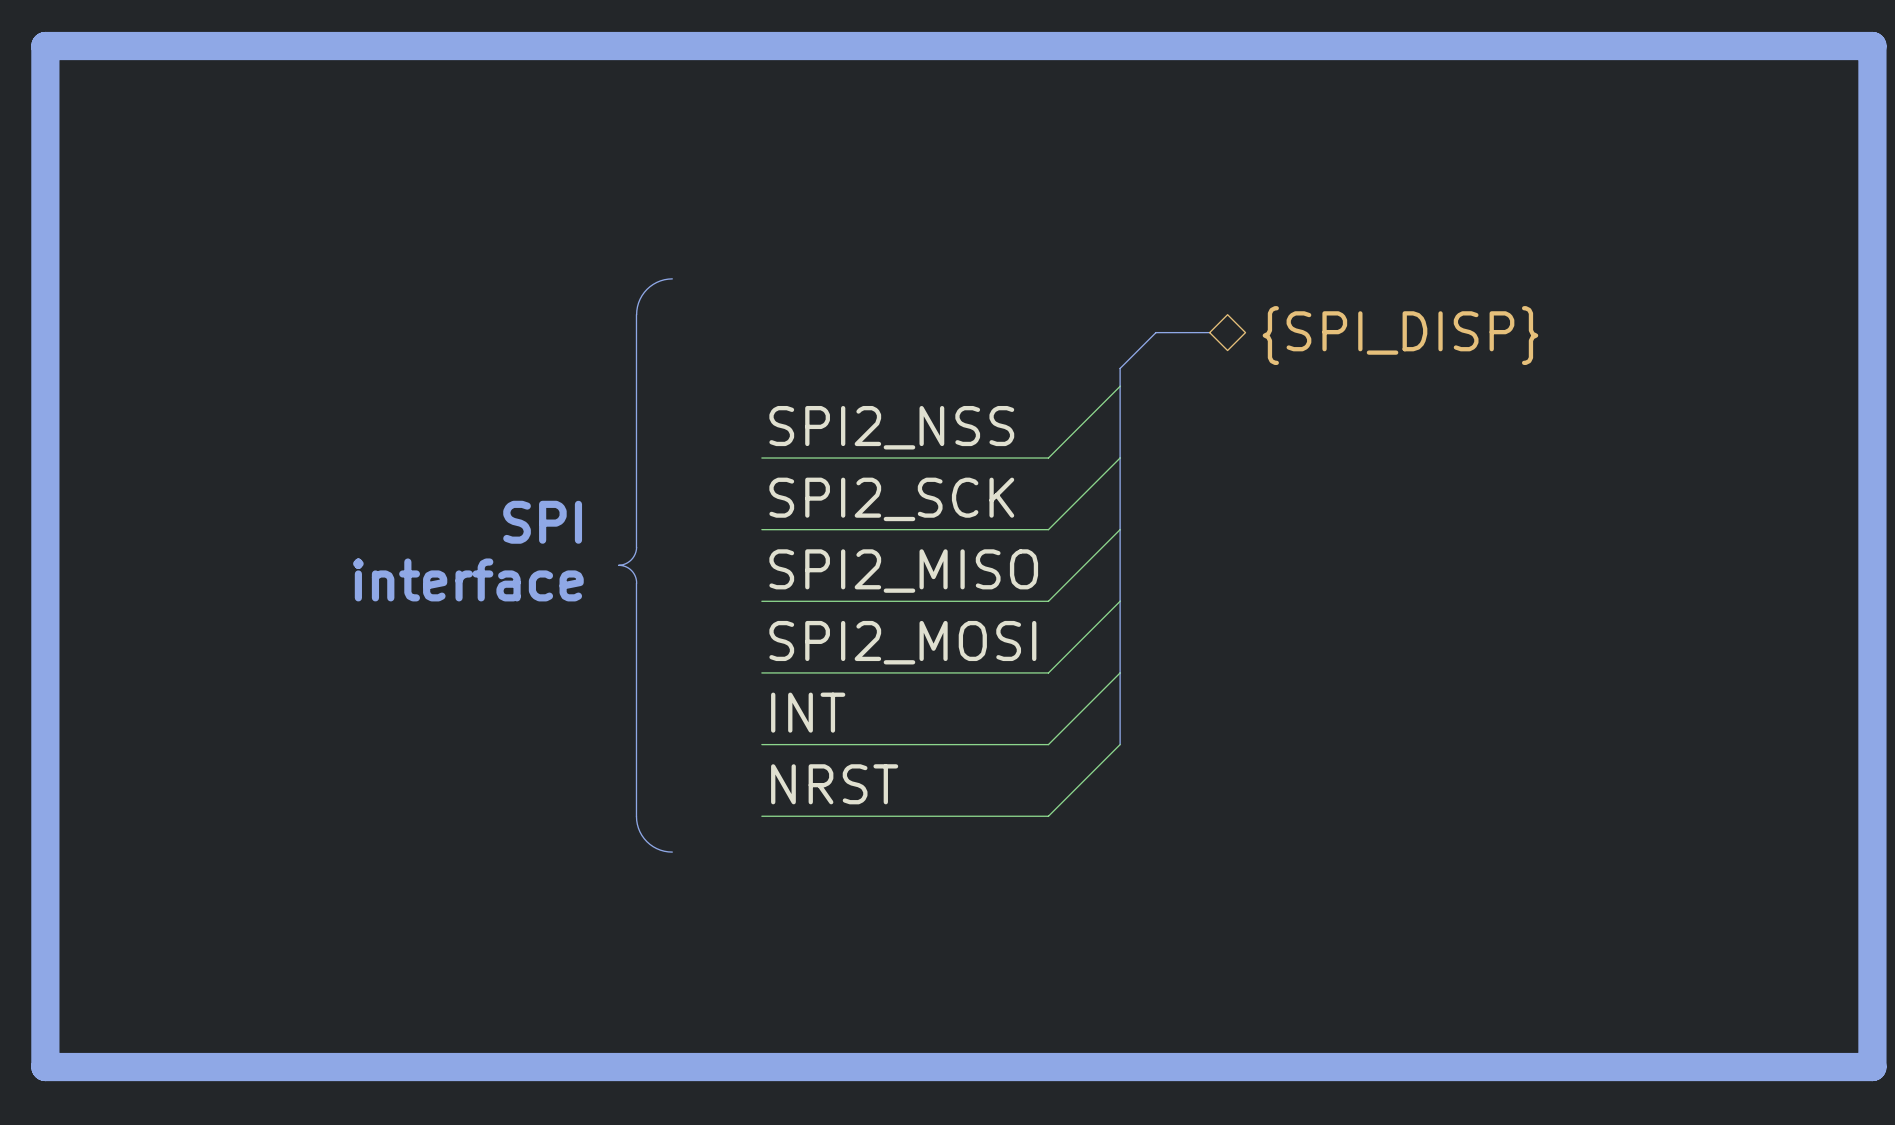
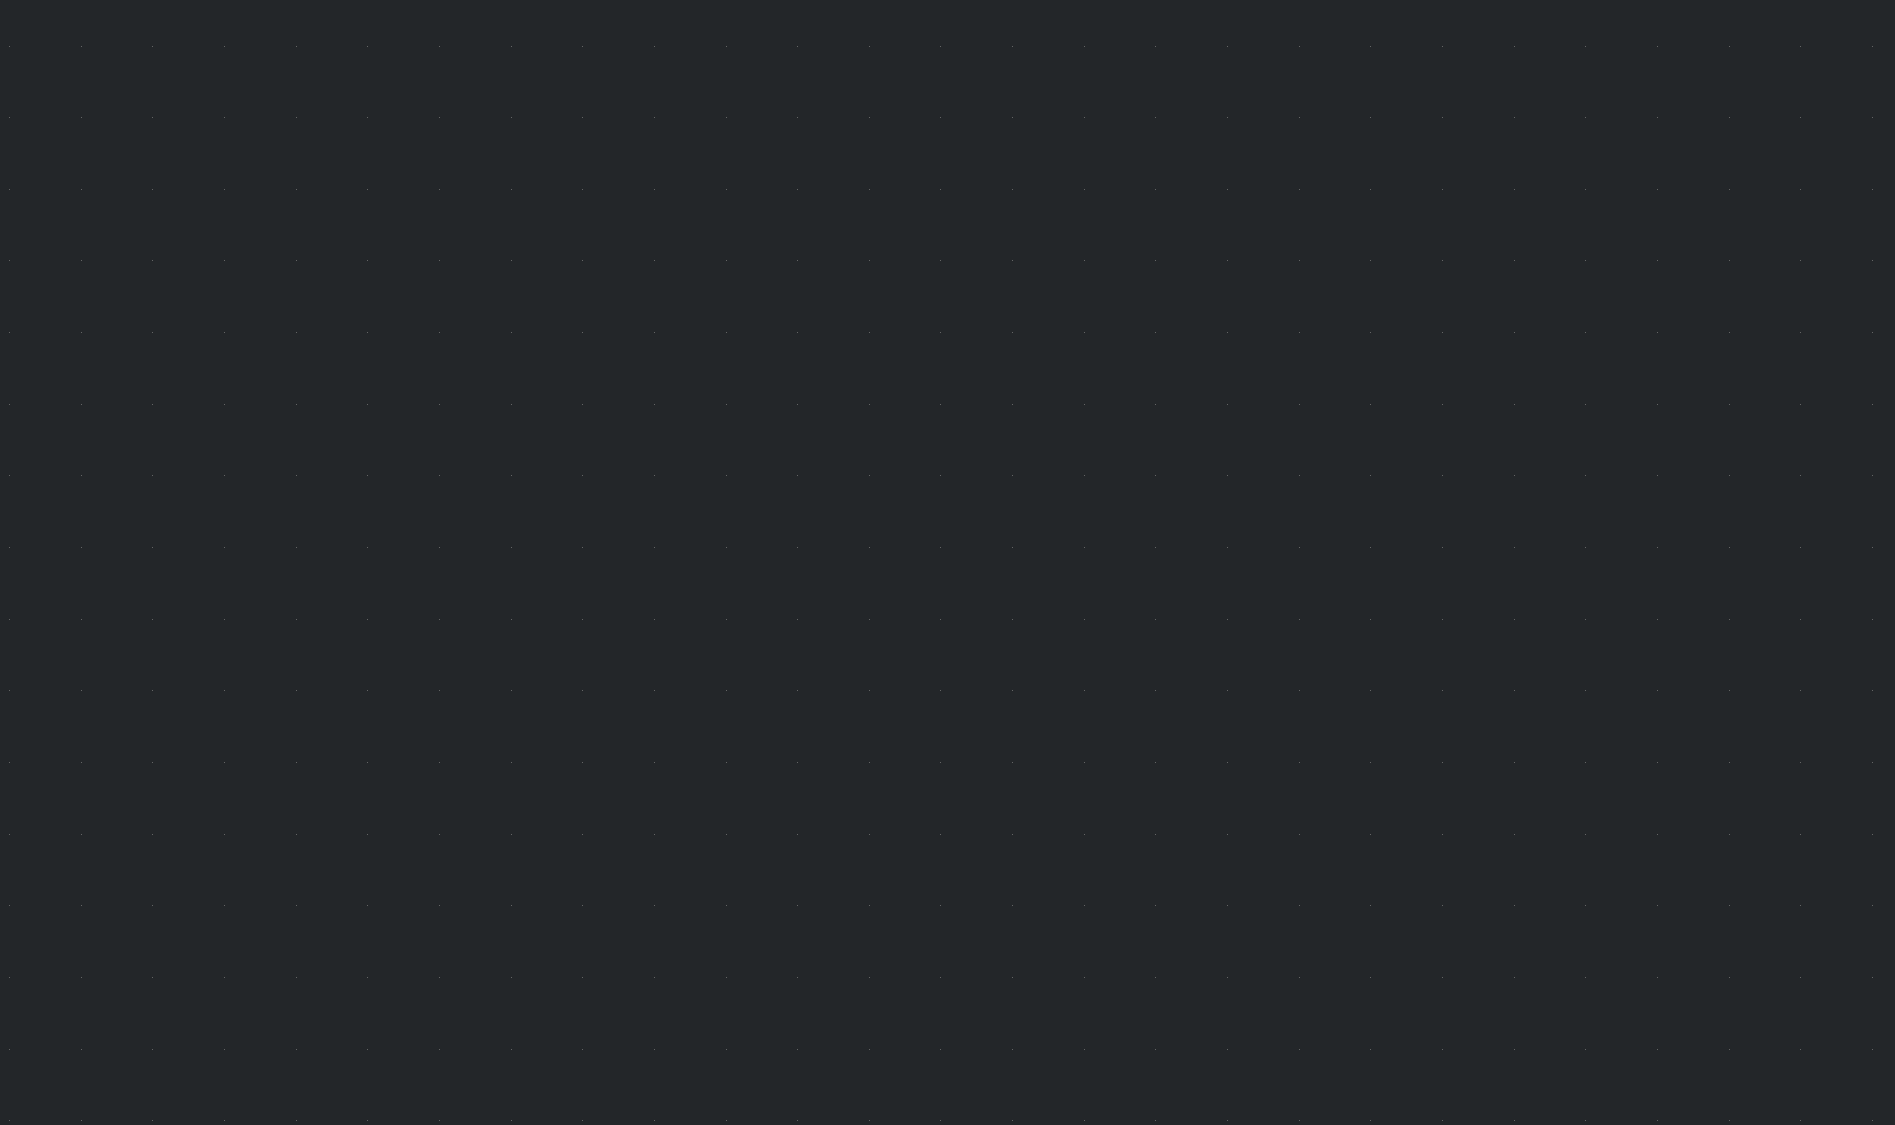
line: (45, 46) (1872, 46) (1872, 1067) (45, 1067) (45, 46) -> none
line: (672, 278) (660, 280) (650, 286) (640, 299) (636, 310) (636, 547) -> none
bus: (1209, 332) (1155, 332) (1120, 368) (1120, 744) -> none
hierarchical label: {SPI_DISP} (1400, 335) -> none
wire: (1120, 386) (1048, 458) (761, 458) -> none
label: SPI2_NSS (891, 427) -> none
wire: (1120, 458) (1048, 529) (761, 529) -> none
label: SPI2_SCK (891, 499) -> none
text: SPI (542, 522) -> none
wire: (1120, 529) (1048, 601) (761, 601) -> none
line: (636, 547) (631, 559) (618, 565) (631, 570) (636, 581) (636, 820) (639, 831) (646, 841) (660, 850) (672, 852) -> none
label: SPI2_MISO (903, 571) -> none
text: interface (468, 579) -> none
wire: (1120, 601) (1048, 672) -> none
label: SPI2_MOSI (902, 642) -> none
wire: (761, 672) (1048, 672) -> none
wire: (1120, 672) (1048, 744) (761, 744) -> none
label: INT (808, 712) -> none
wire: (1120, 744) (1048, 816) (761, 816) -> none
label: NRST (834, 784) -> none

